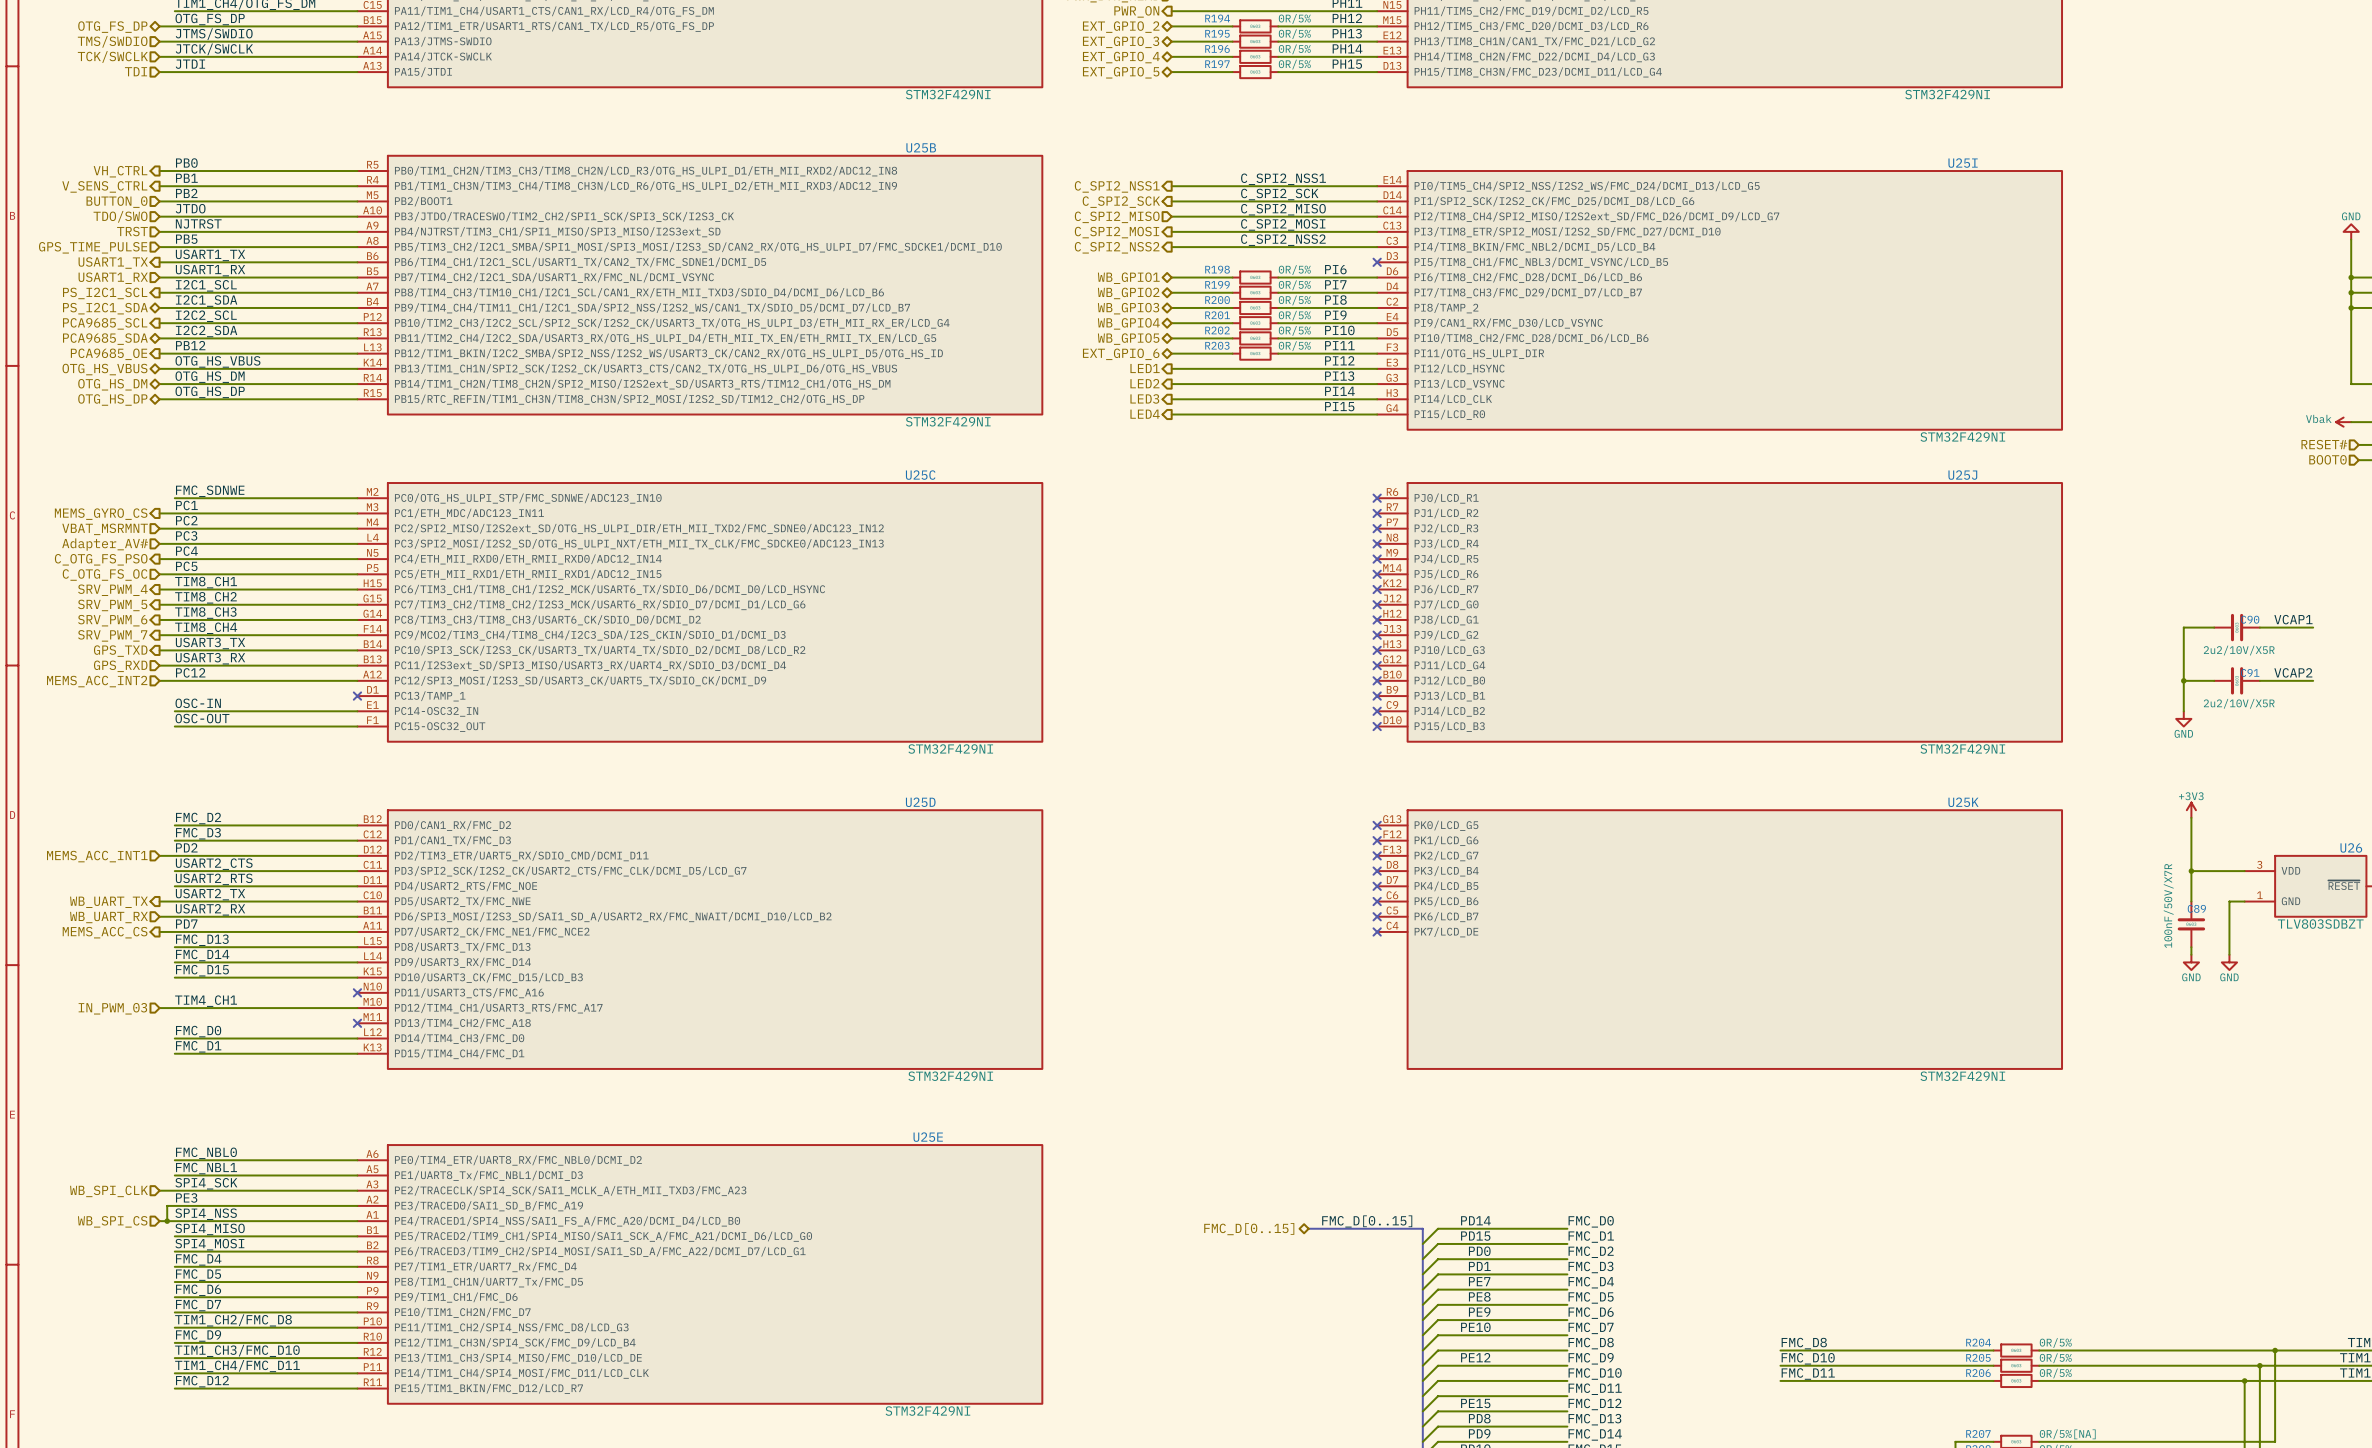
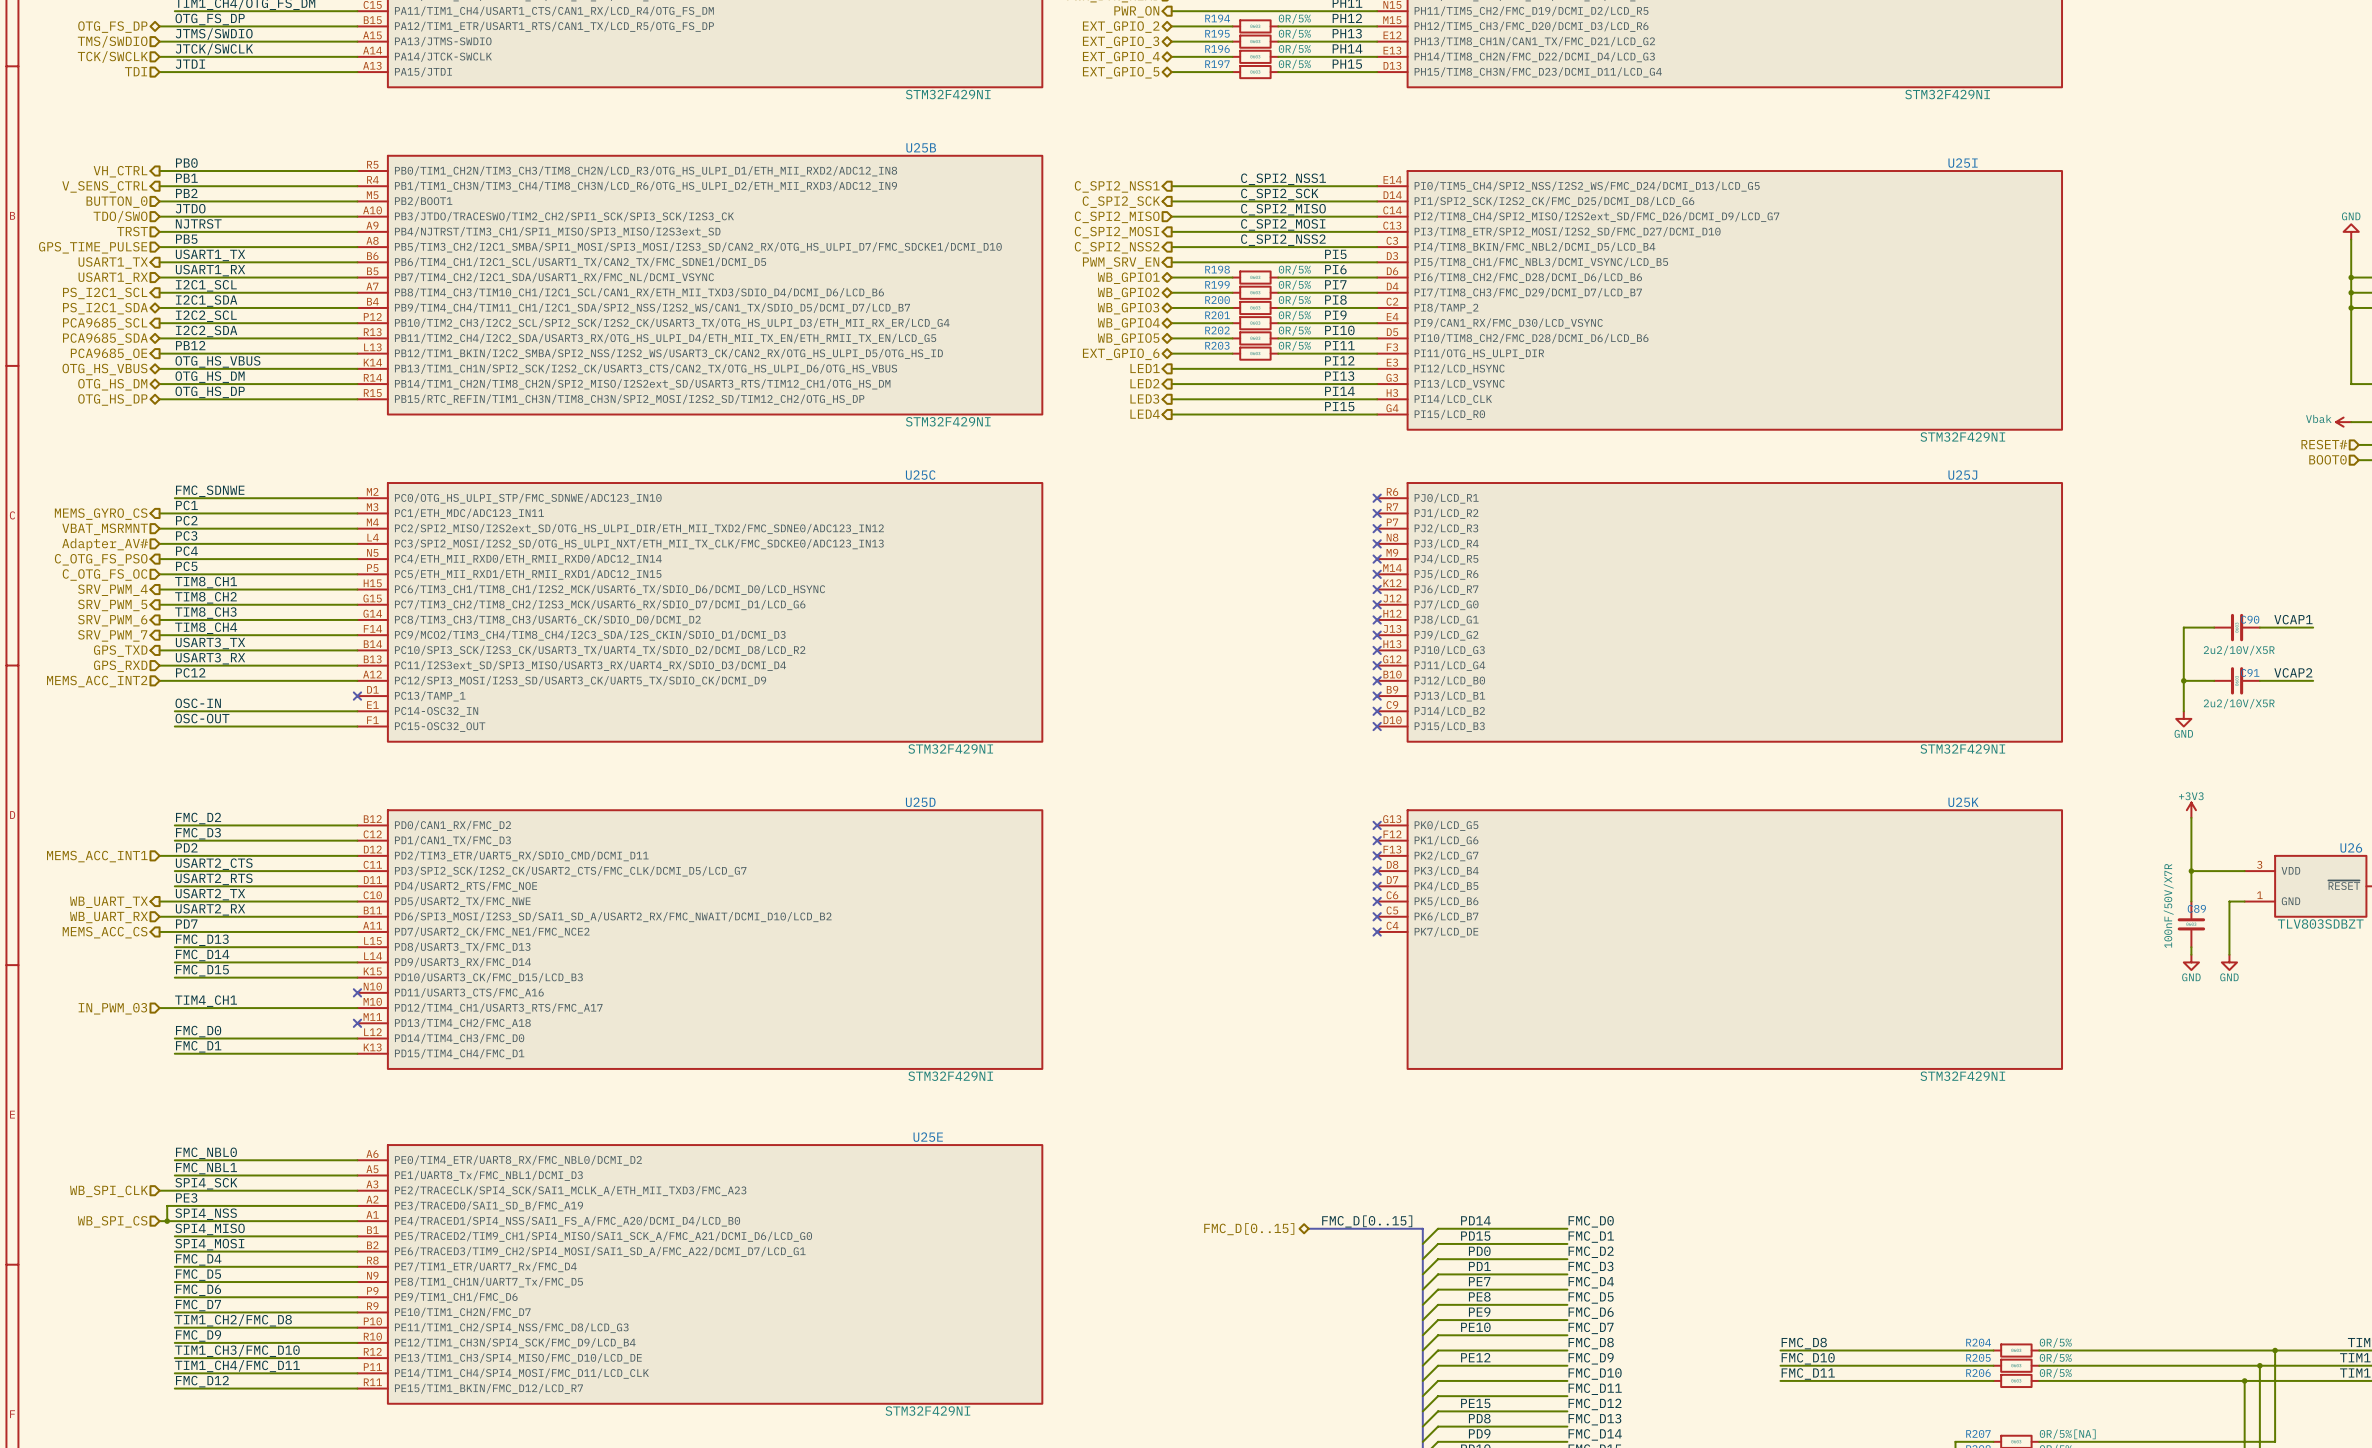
label: none -> PI5 (1335, 254)
wire: none -> (1171, 262) (1377, 262)
no-connect mark: (1377, 262) -> none
hierarchical label: none -> PWM_SRV_EN (1121, 263)

